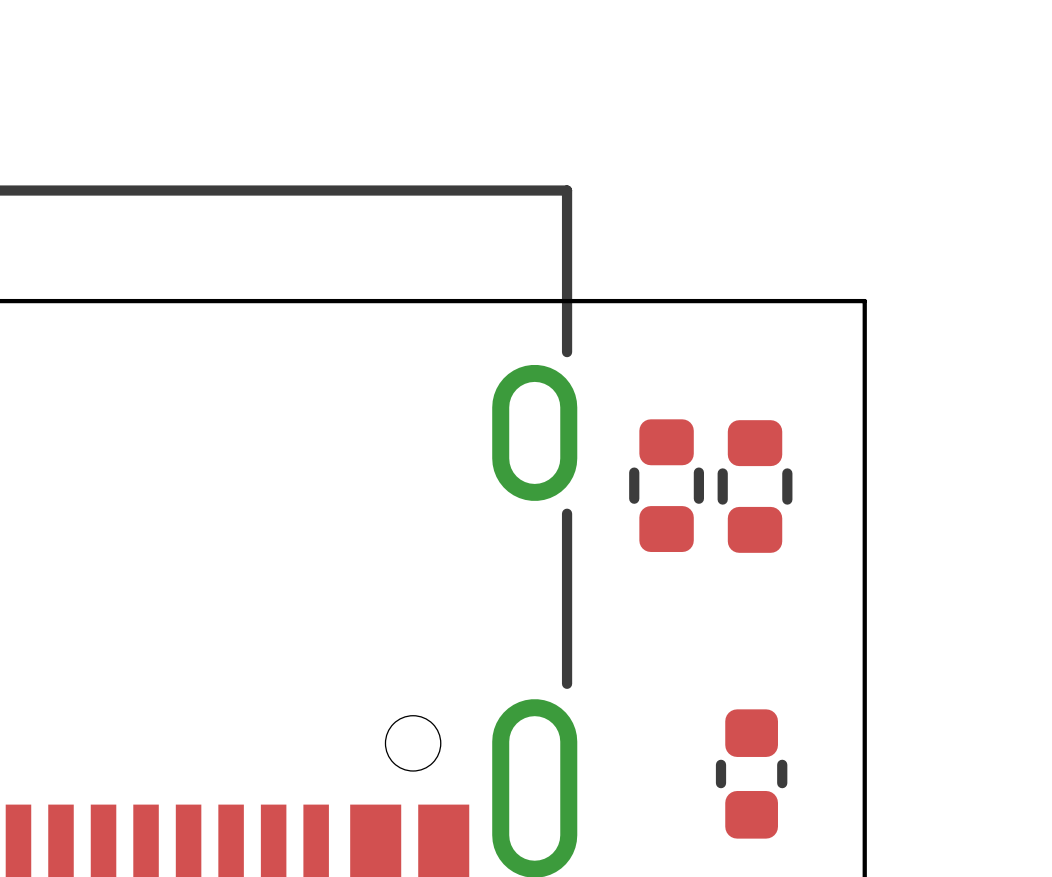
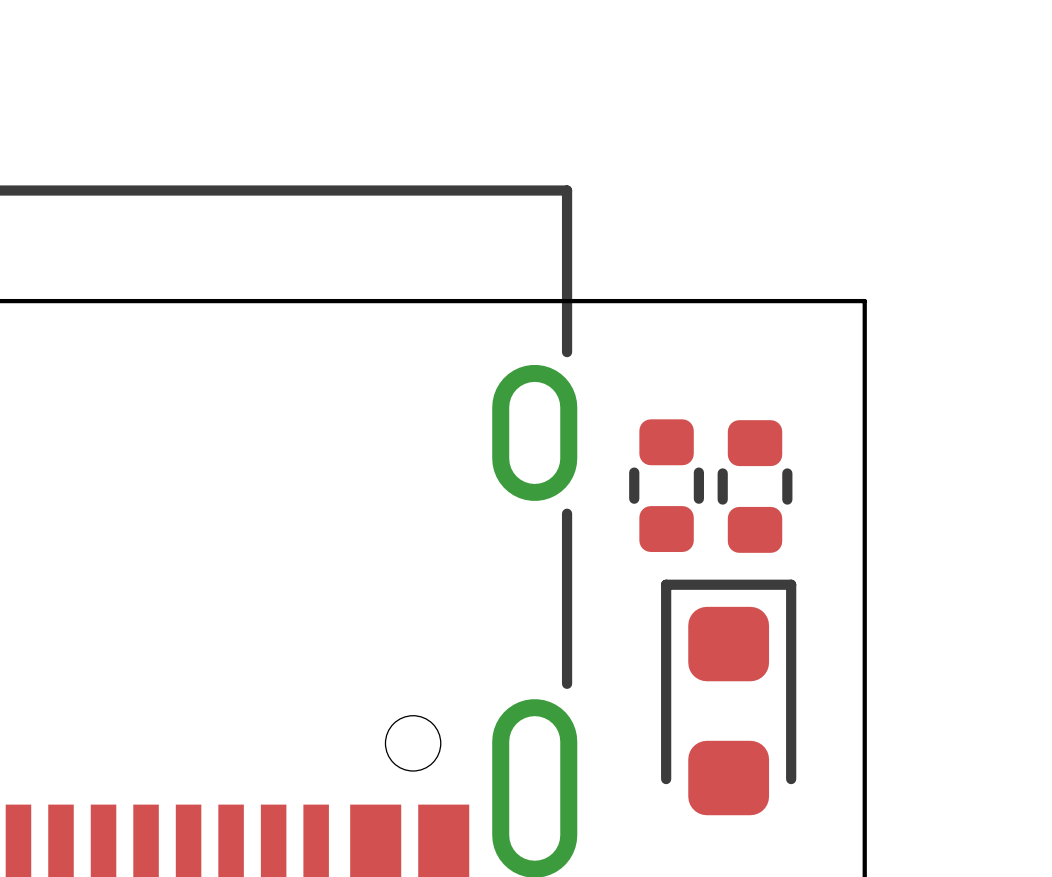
part footprint: [715, 709, 788, 839] -> [661, 579, 797, 816]

